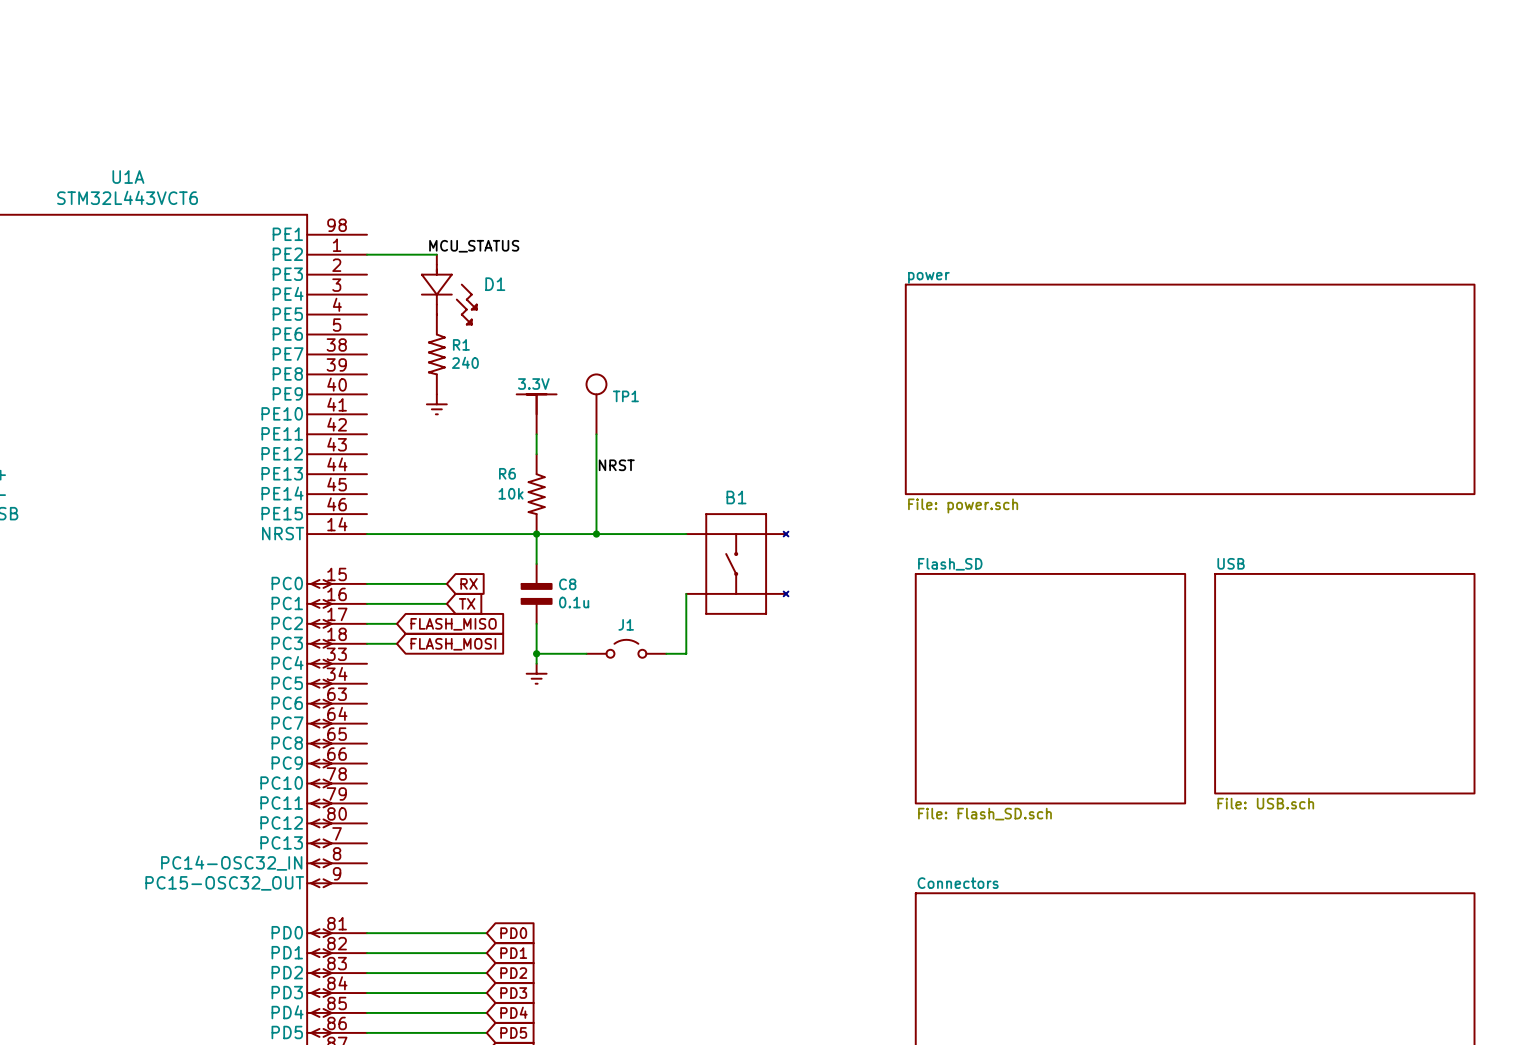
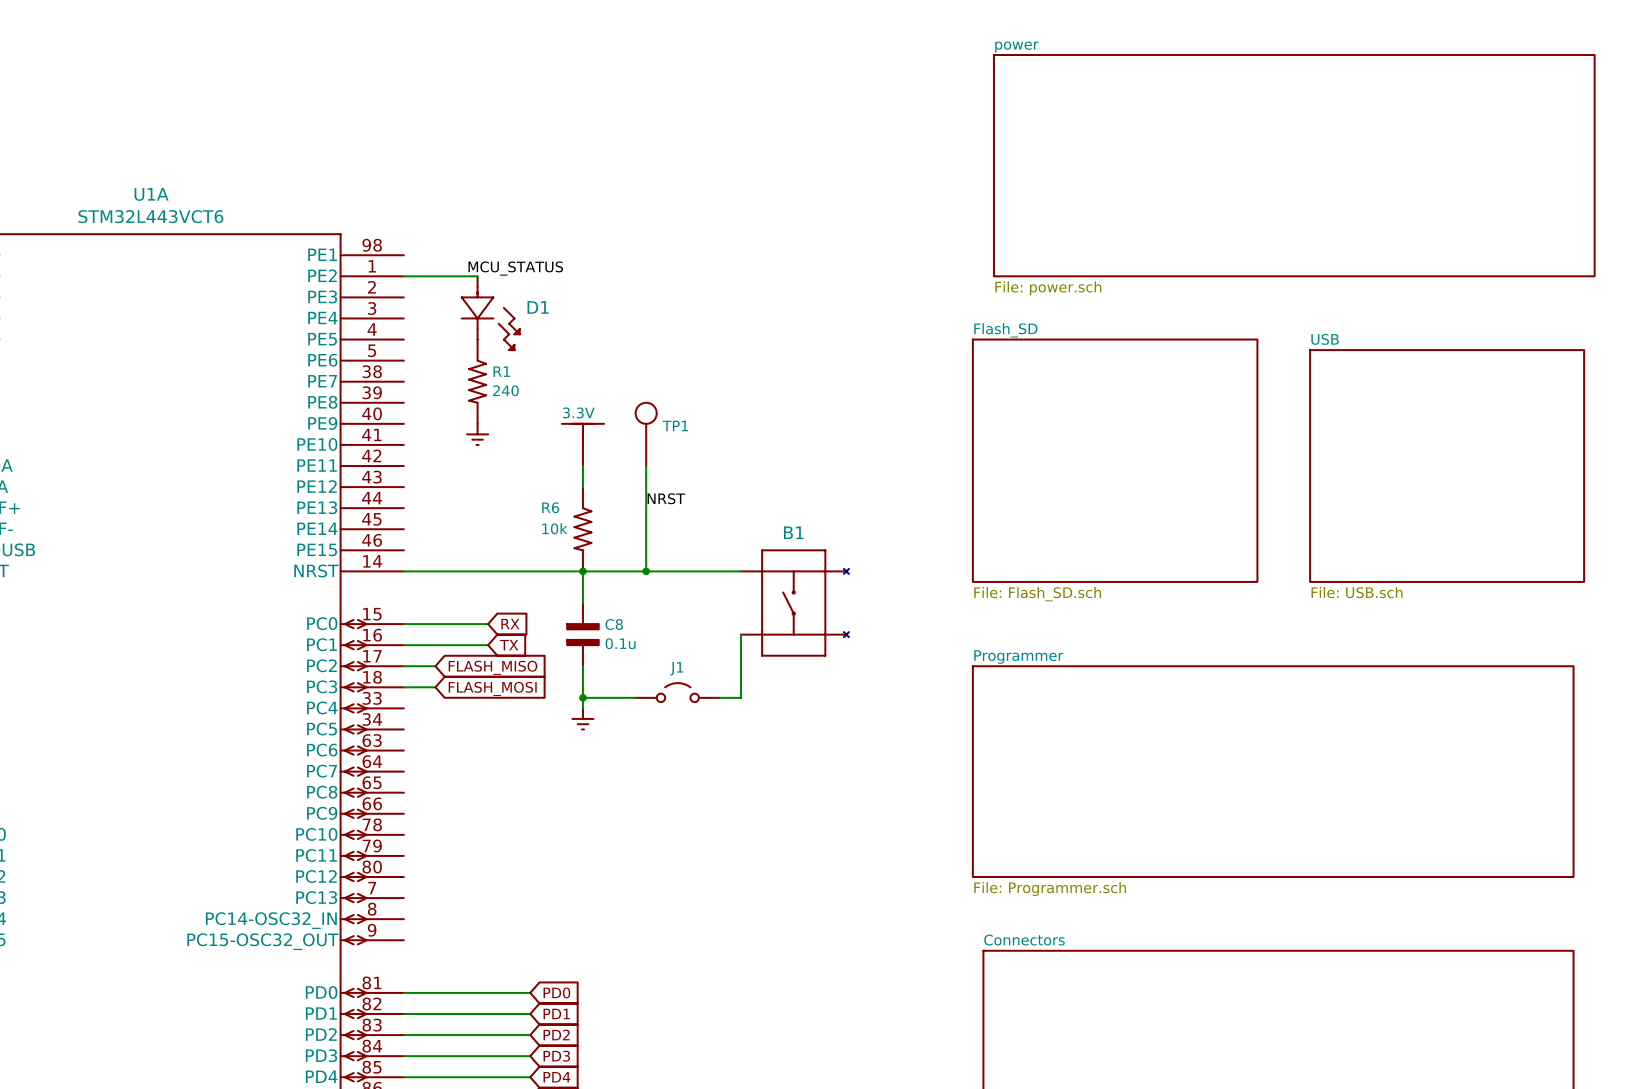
sheet power: none -> File: power.sch (1294, 165)
sheet power: File: power.sch (1190, 389) -> none
sheet Flash_SD: none -> File: Flash_SD.sch (1115, 460)
sheet USB: none -> File: USB.sch (1447, 466)
sheet USB: File: USB.sch (1344, 683) -> none
sheet Flash_SD: File: Flash_SD.sch (1050, 688) -> none
sheet Programmer: none -> File: Programmer.sch (1273, 771)

